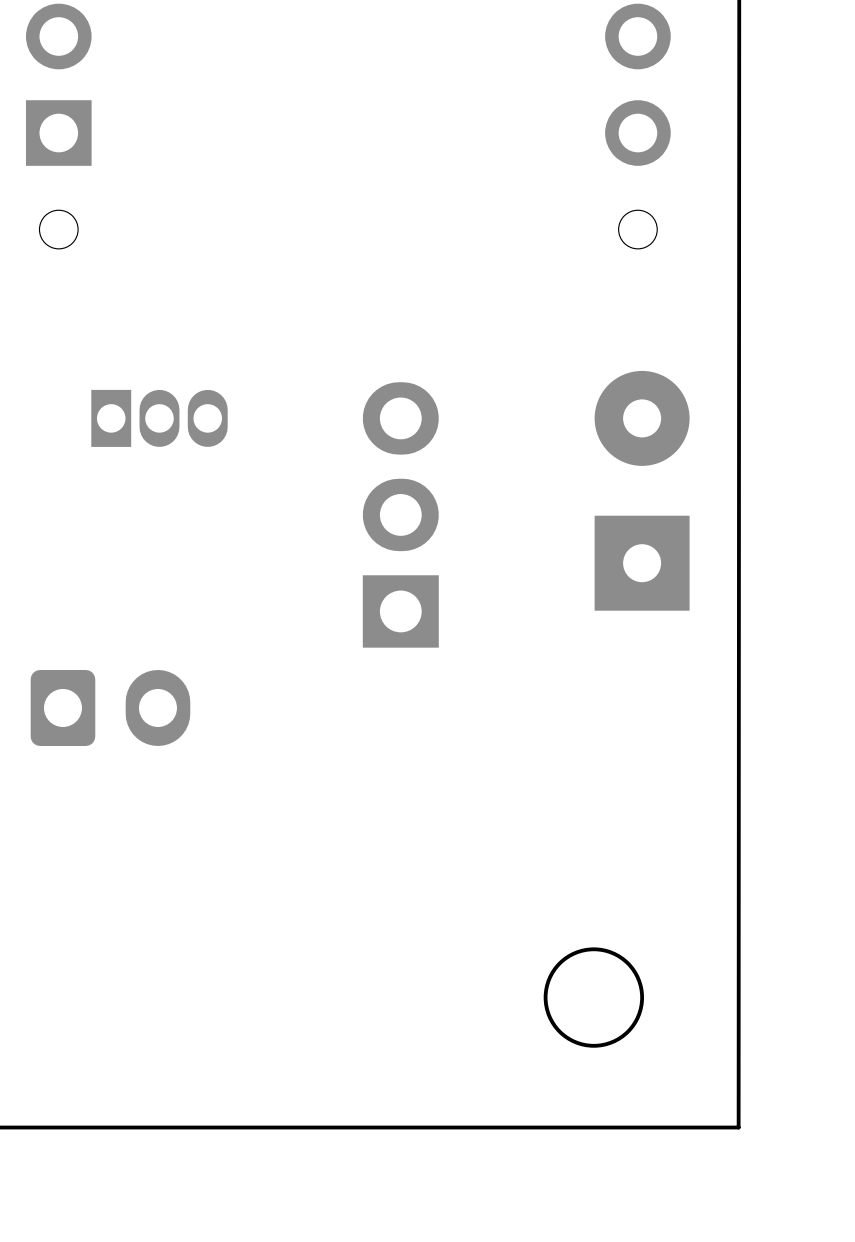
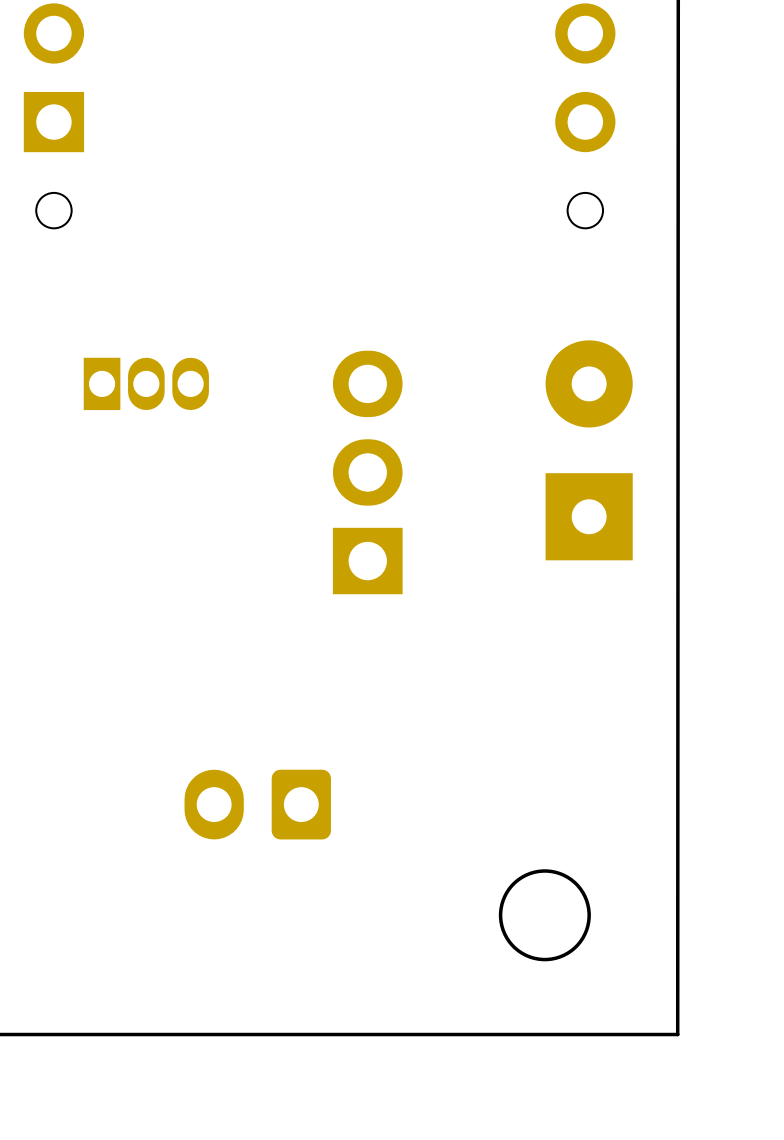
part rotation: 0° (110, 707) -> 180° (257, 804)
part position: (110, 707) -> (257, 804)

